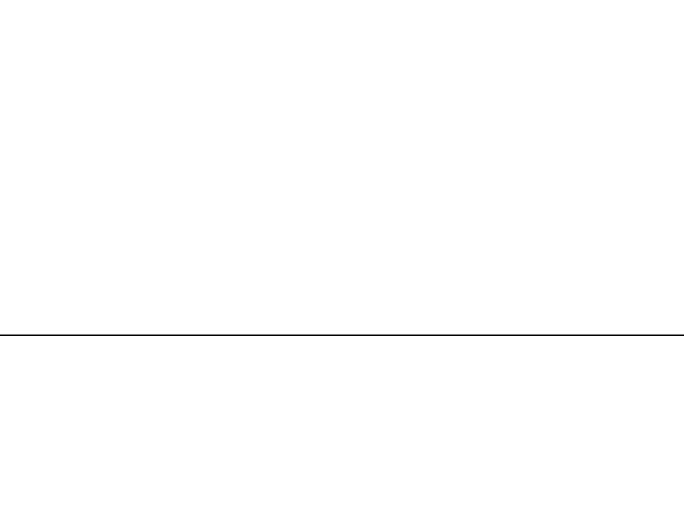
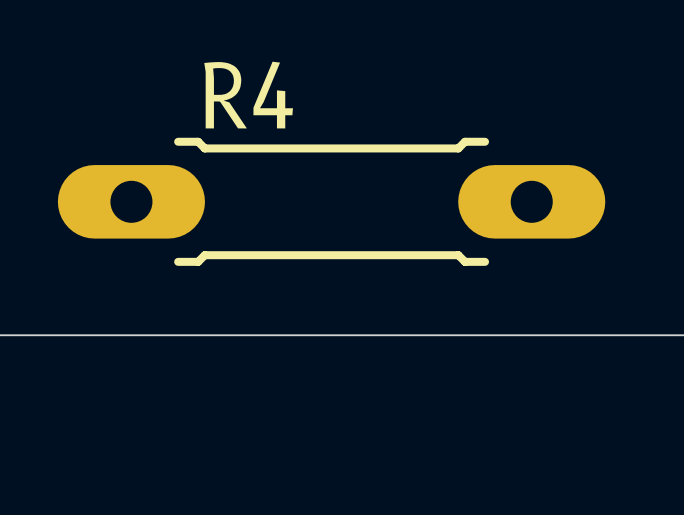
R4: none -> (331, 201)

